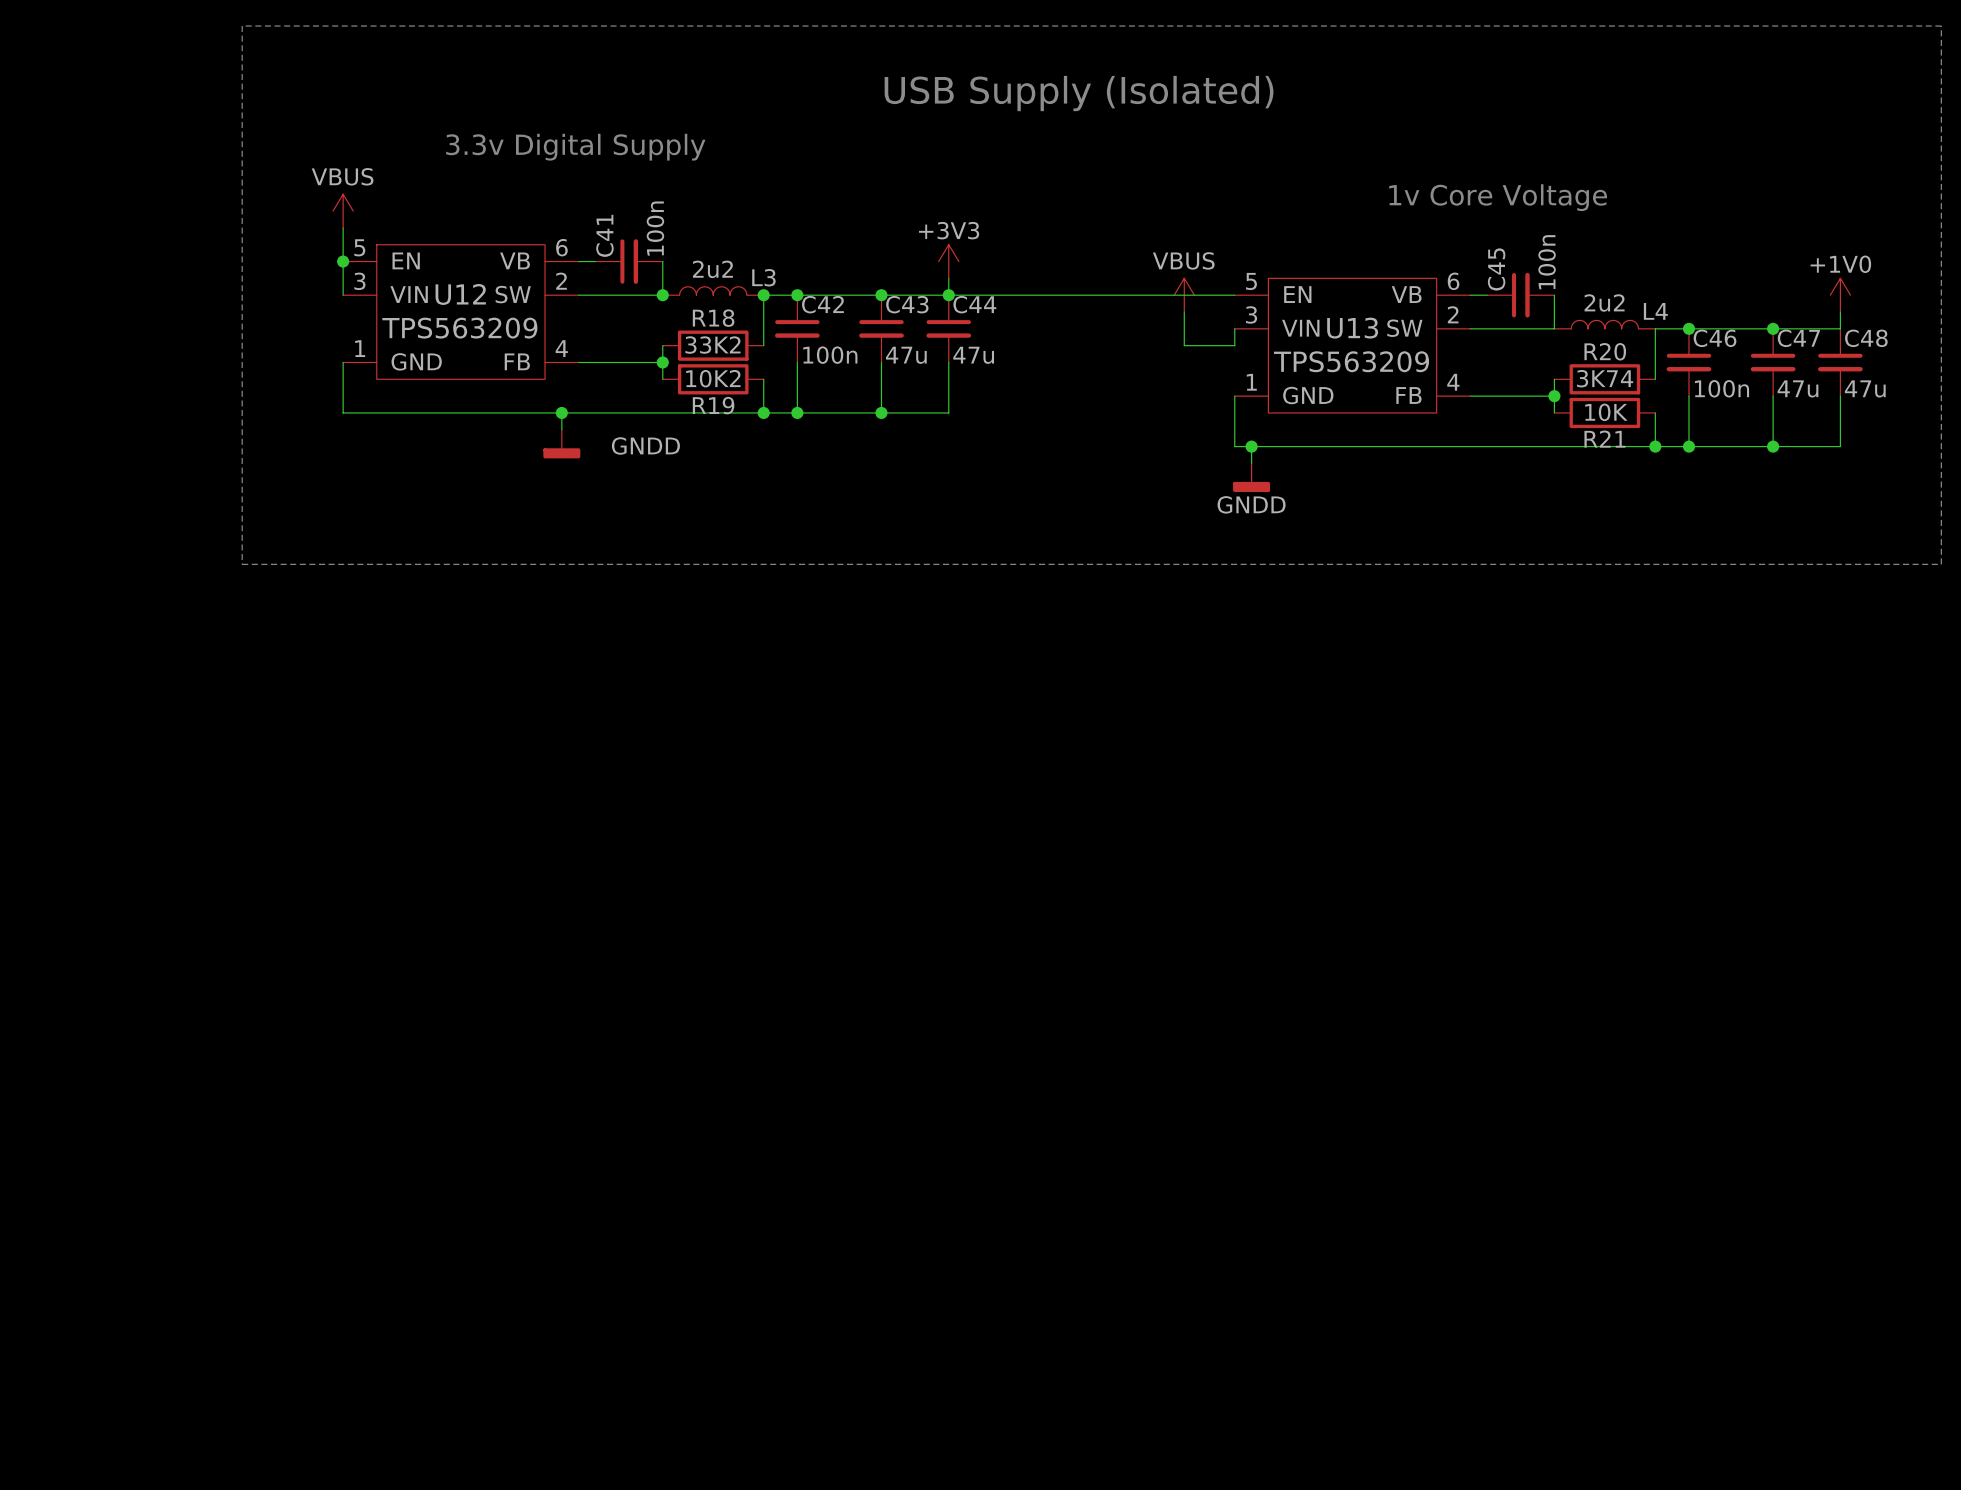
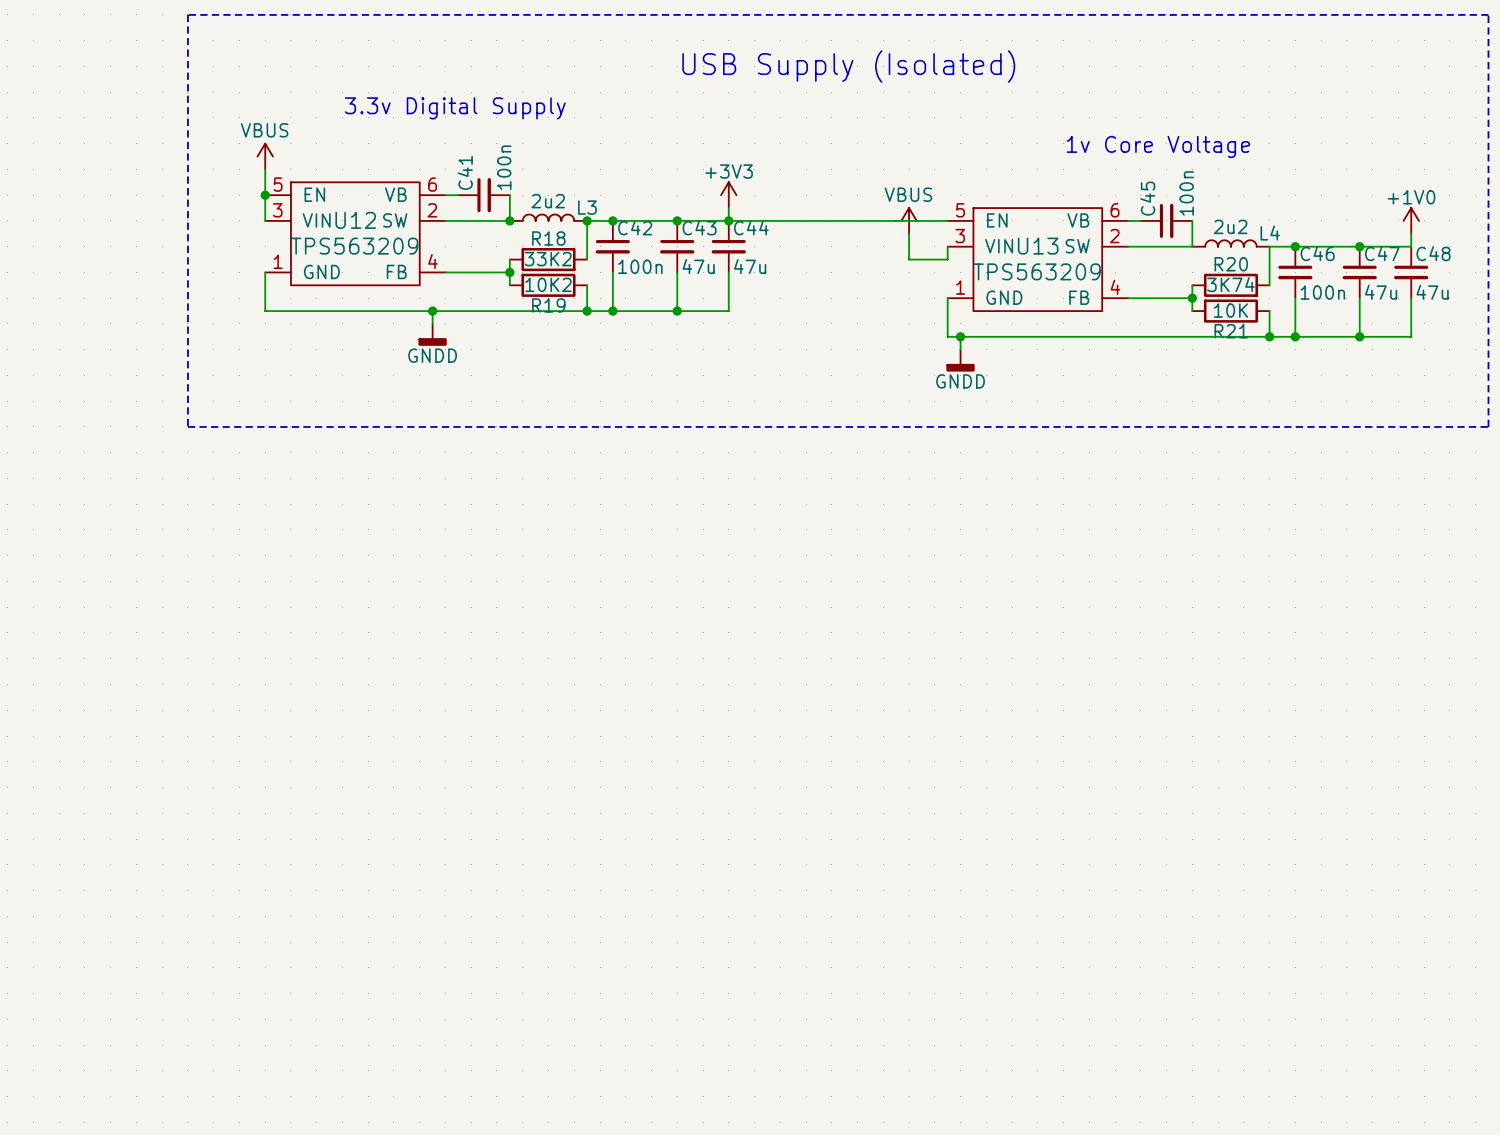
power symbol text position: GNDD (645, 445) -> GNDD (432, 355)

